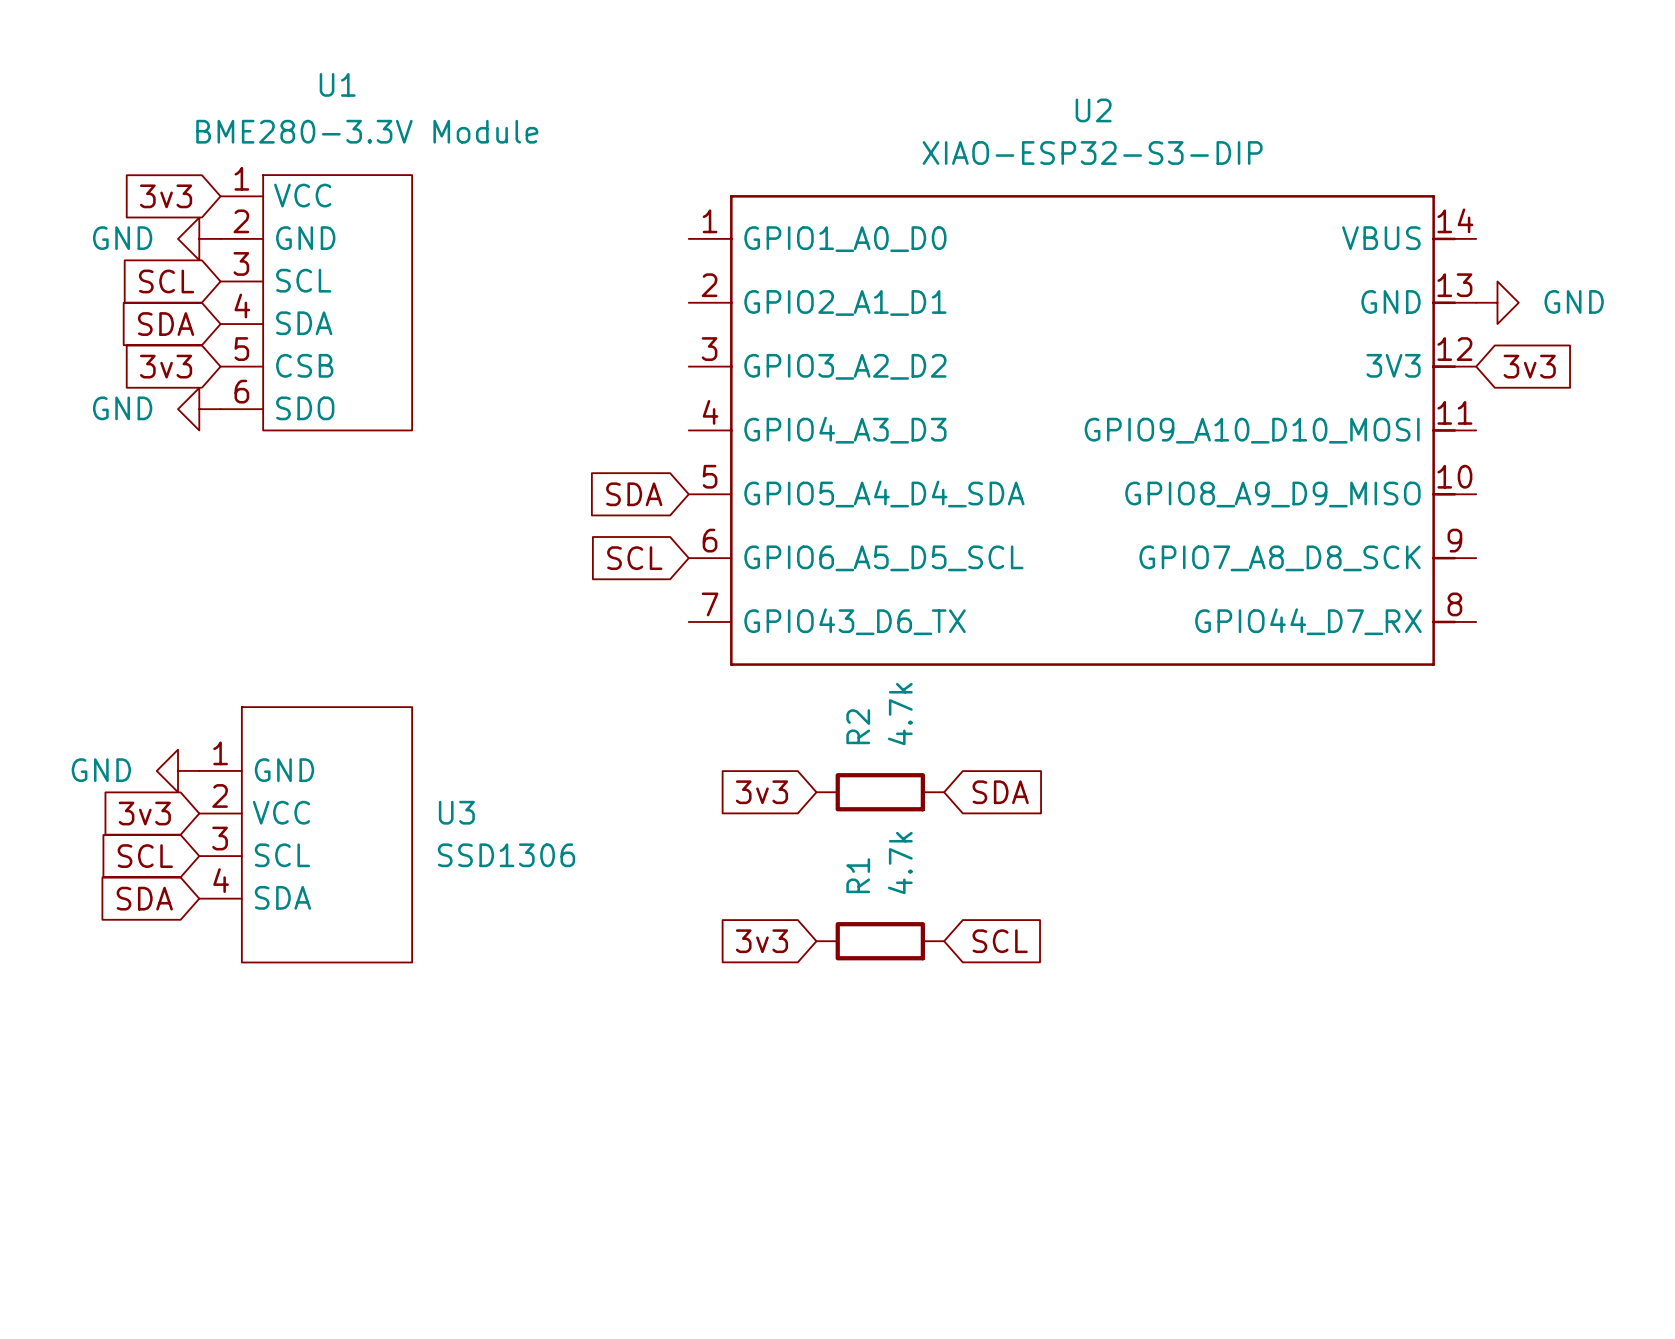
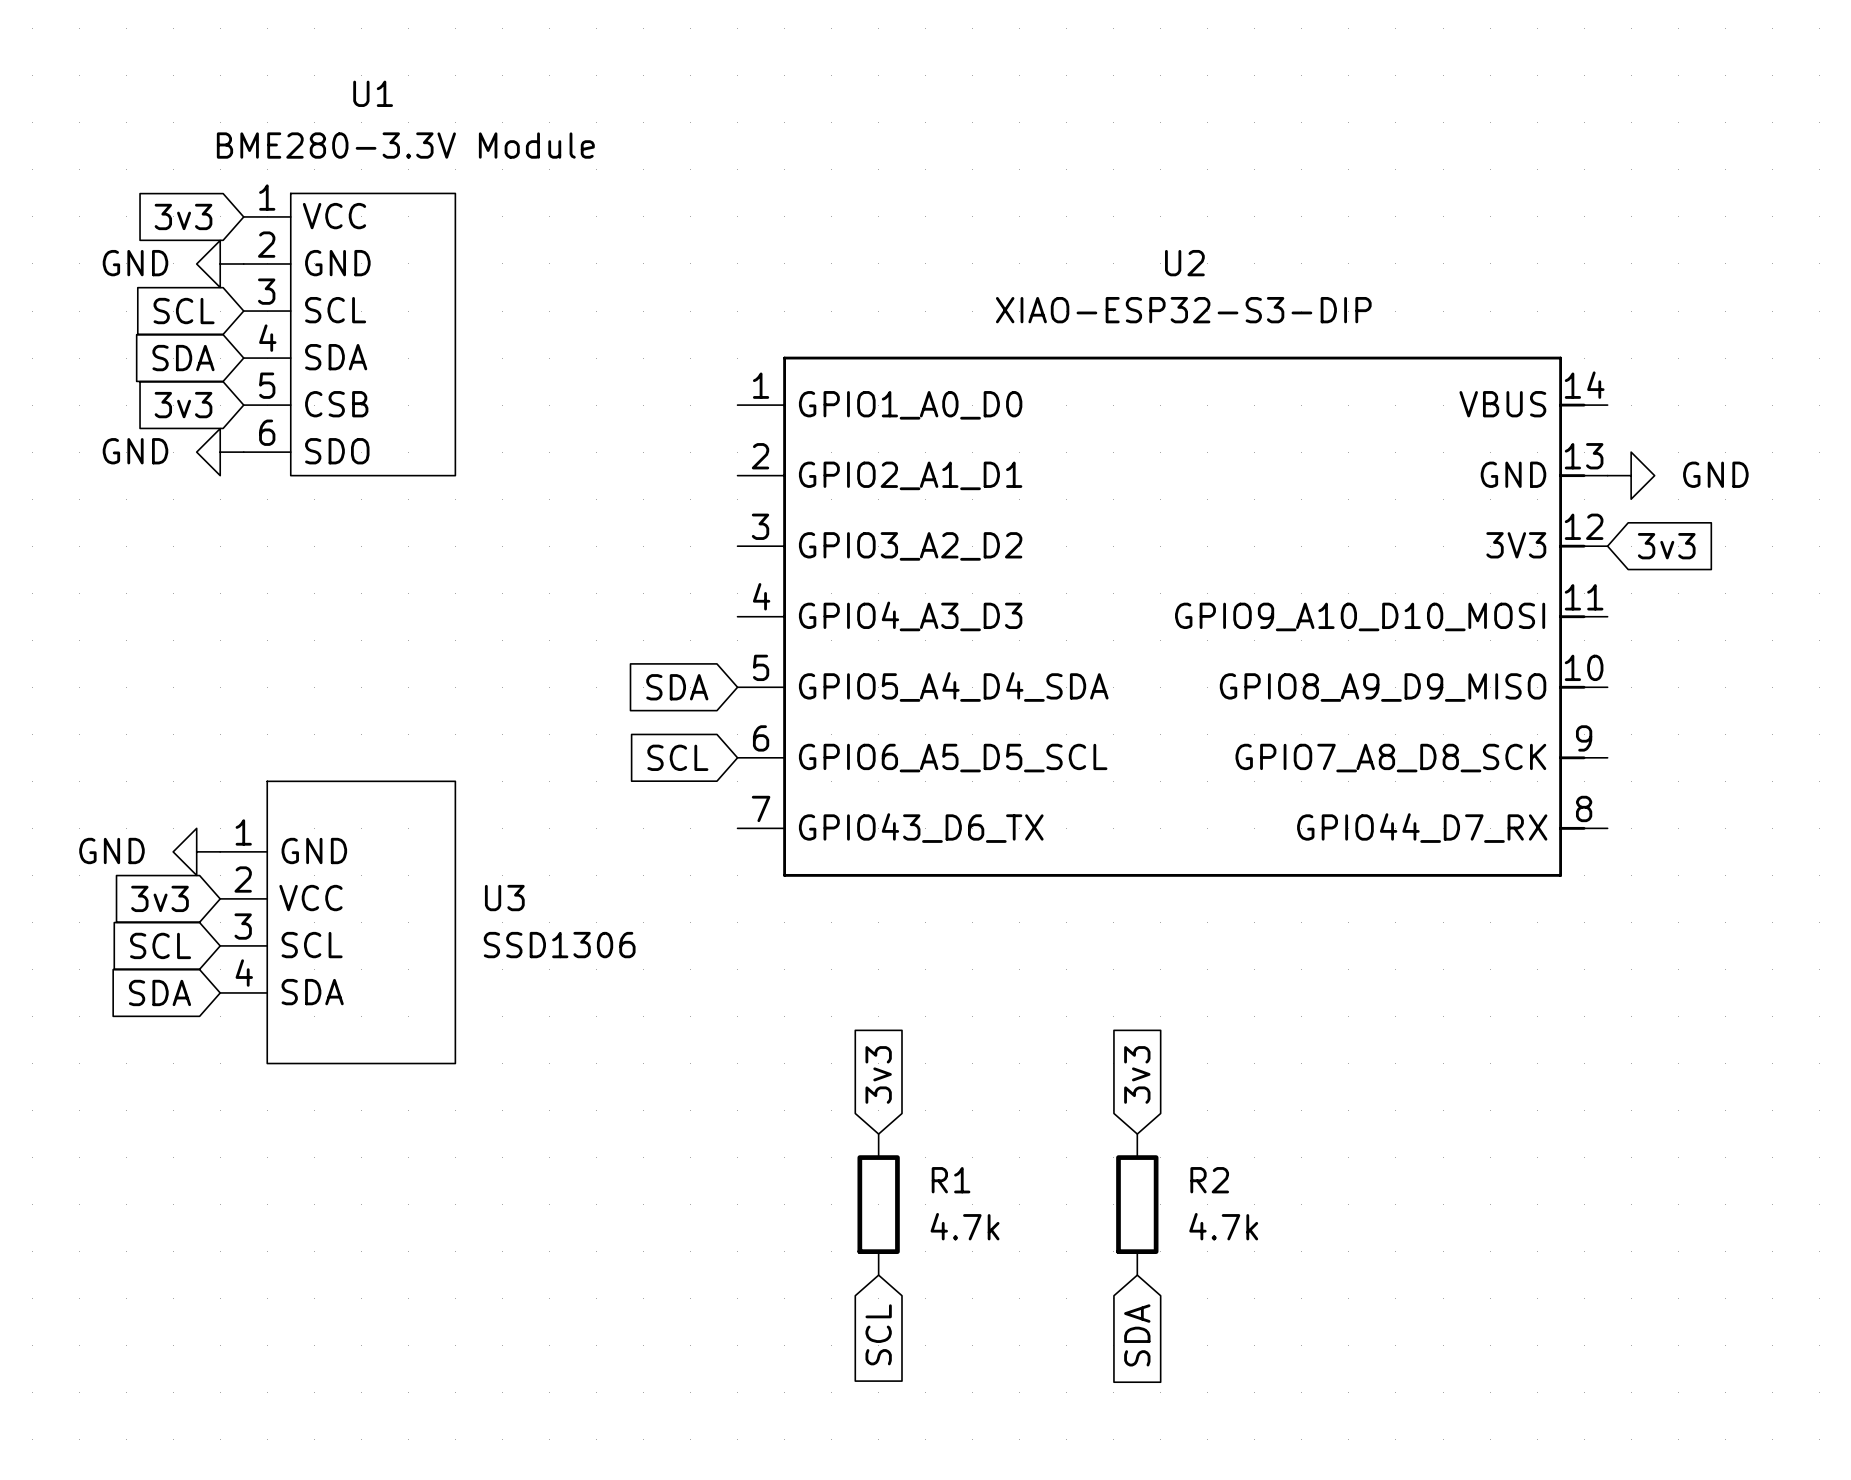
power symbol position: GND (1497, 302) -> GND (1631, 475)
global label position: 3v3 (1529, 366) -> 3v3 (1666, 546)
U2 position: (1082, 430) -> (1172, 616)
global label position: SDA (634, 494) -> SDA (677, 687)
global label position: SCL (634, 558) -> SCL (677, 757)
global label: 3v3 (761, 792) -> none
R2 rotation: 0° (880, 792) -> 90° clockwise (1137, 1204)
R2 position: (880, 792) -> (1137, 1204)
global label: SDA (1000, 792) -> none
global label rotation: 0° (761, 941) -> 90° clockwise (878, 1074)
R1 rotation: 0° (880, 941) -> 90° clockwise (878, 1204)
R1 position: (880, 941) -> (878, 1204)
global label: SCL (1000, 941) -> none
global label: none -> 3v3 (1137, 1074)
global label: none -> SCL (878, 1334)
global label: none -> SDA (1137, 1335)

